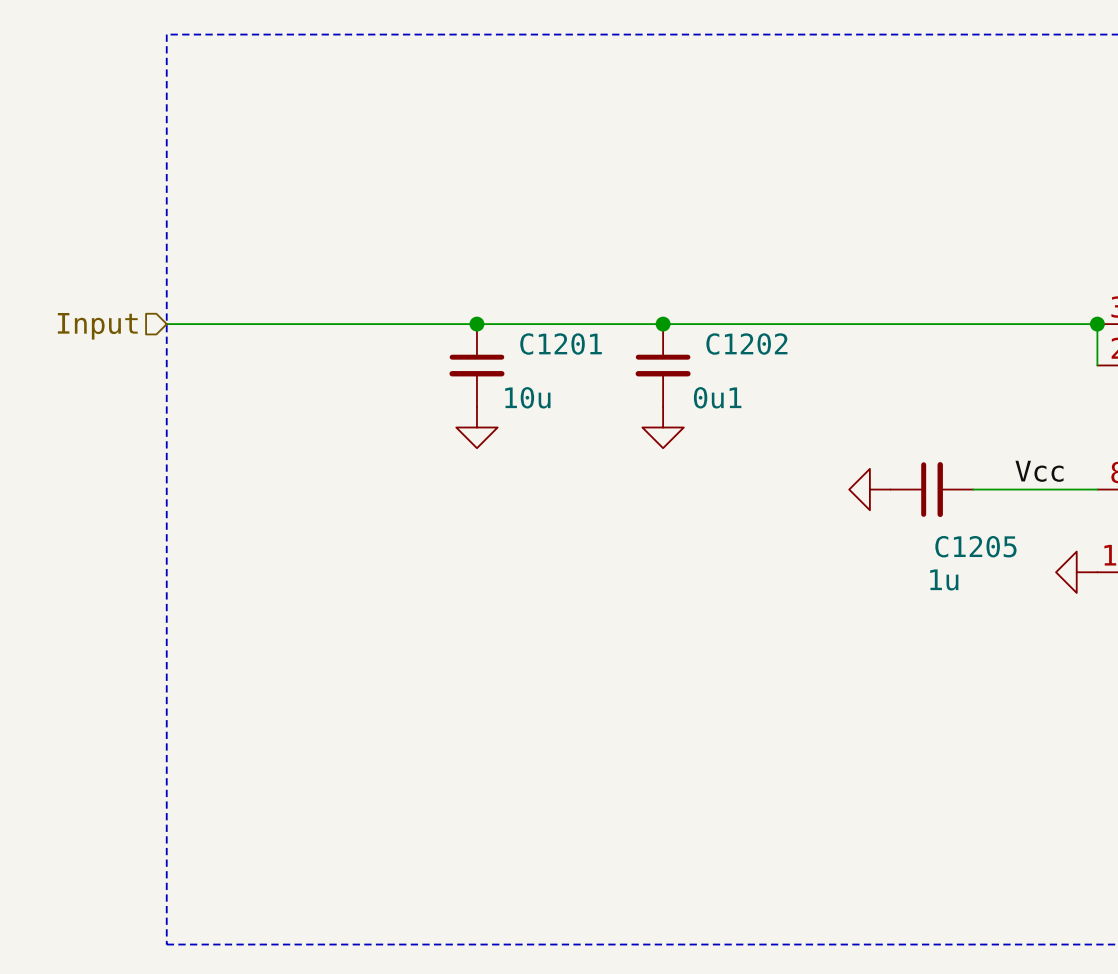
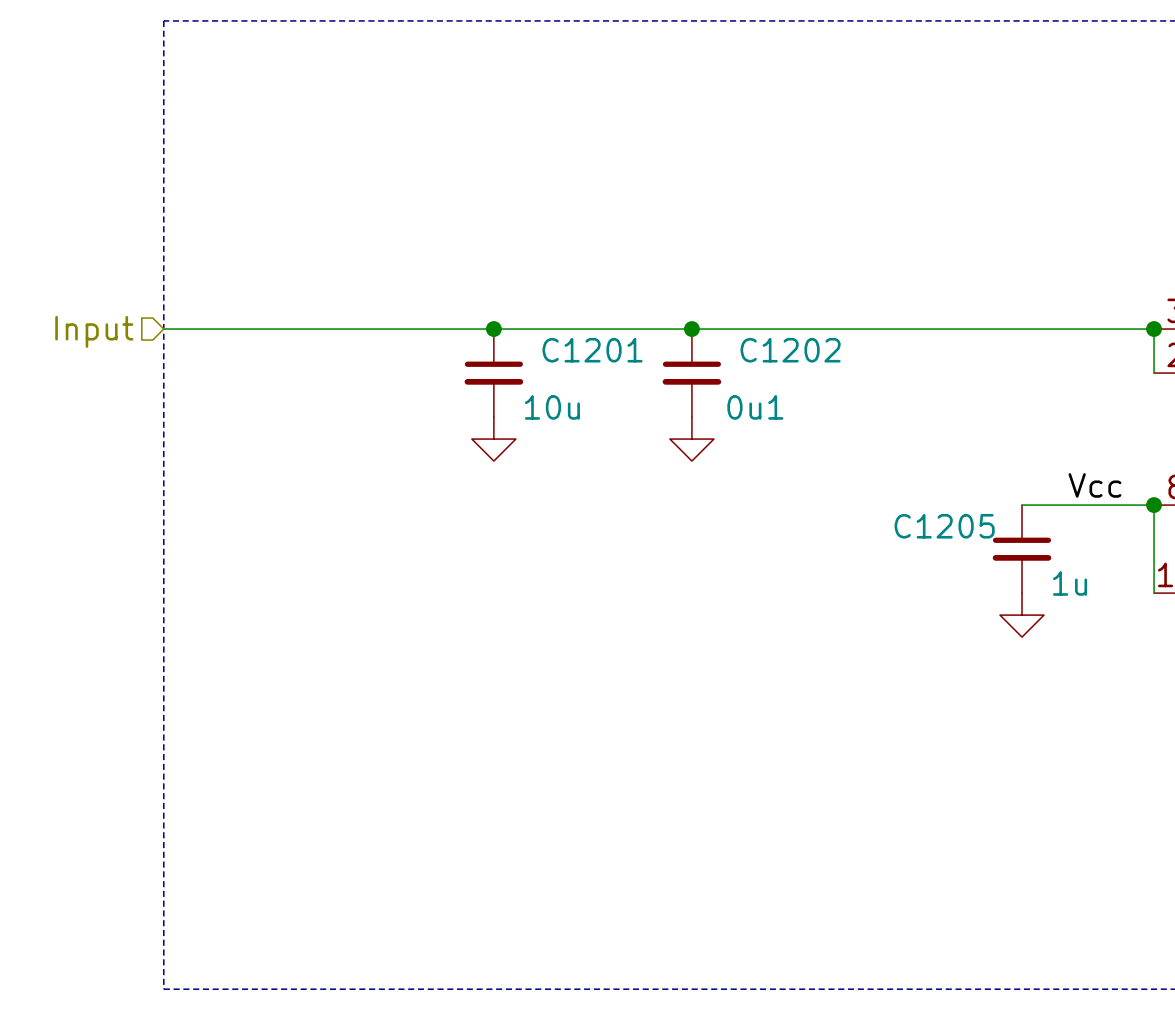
power symbol: (869, 489) -> none
C1205 position: (931, 489) -> (1022, 549)
C1205 rotation: 0° (932, 489) -> 90° clockwise (1022, 549)
wire: none -> (1154, 505) (1154, 593)
junction: none -> (1154, 505)
C1205 name position: C1205 (975, 546) -> C1205 (944, 526)
power symbol: (1076, 572) -> none
C1205 value position: 1u (944, 579) -> 1u (1070, 583)
power symbol: none -> (1022, 615)

